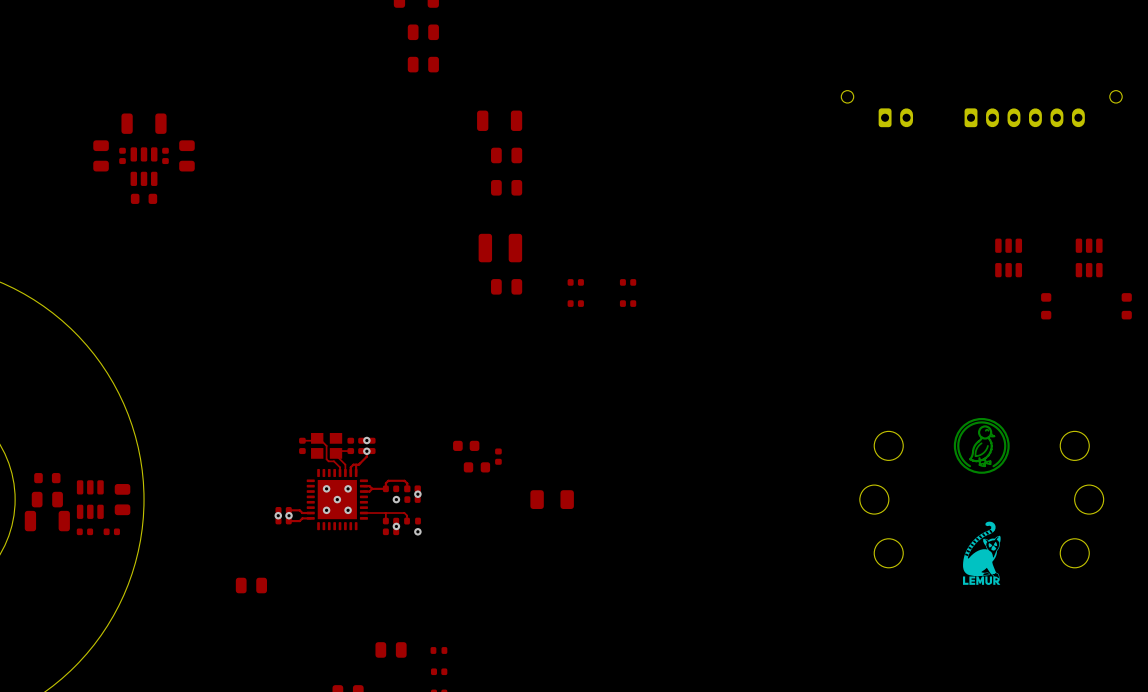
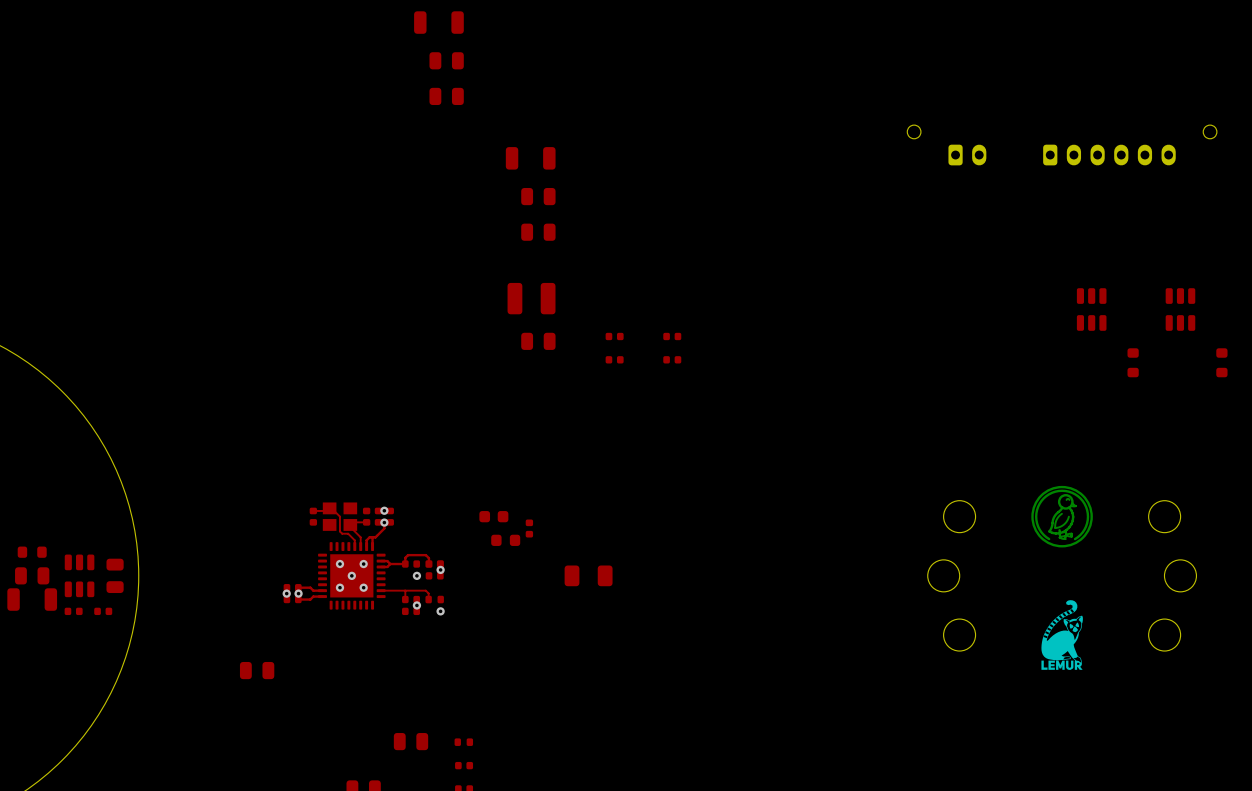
part: (144, 123) -> none
part: (101, 155) -> none
part: (122, 155) -> none
part: (165, 155) -> none
part: (186, 155) -> none
part: (144, 166) -> none
part: (144, 198) -> none

